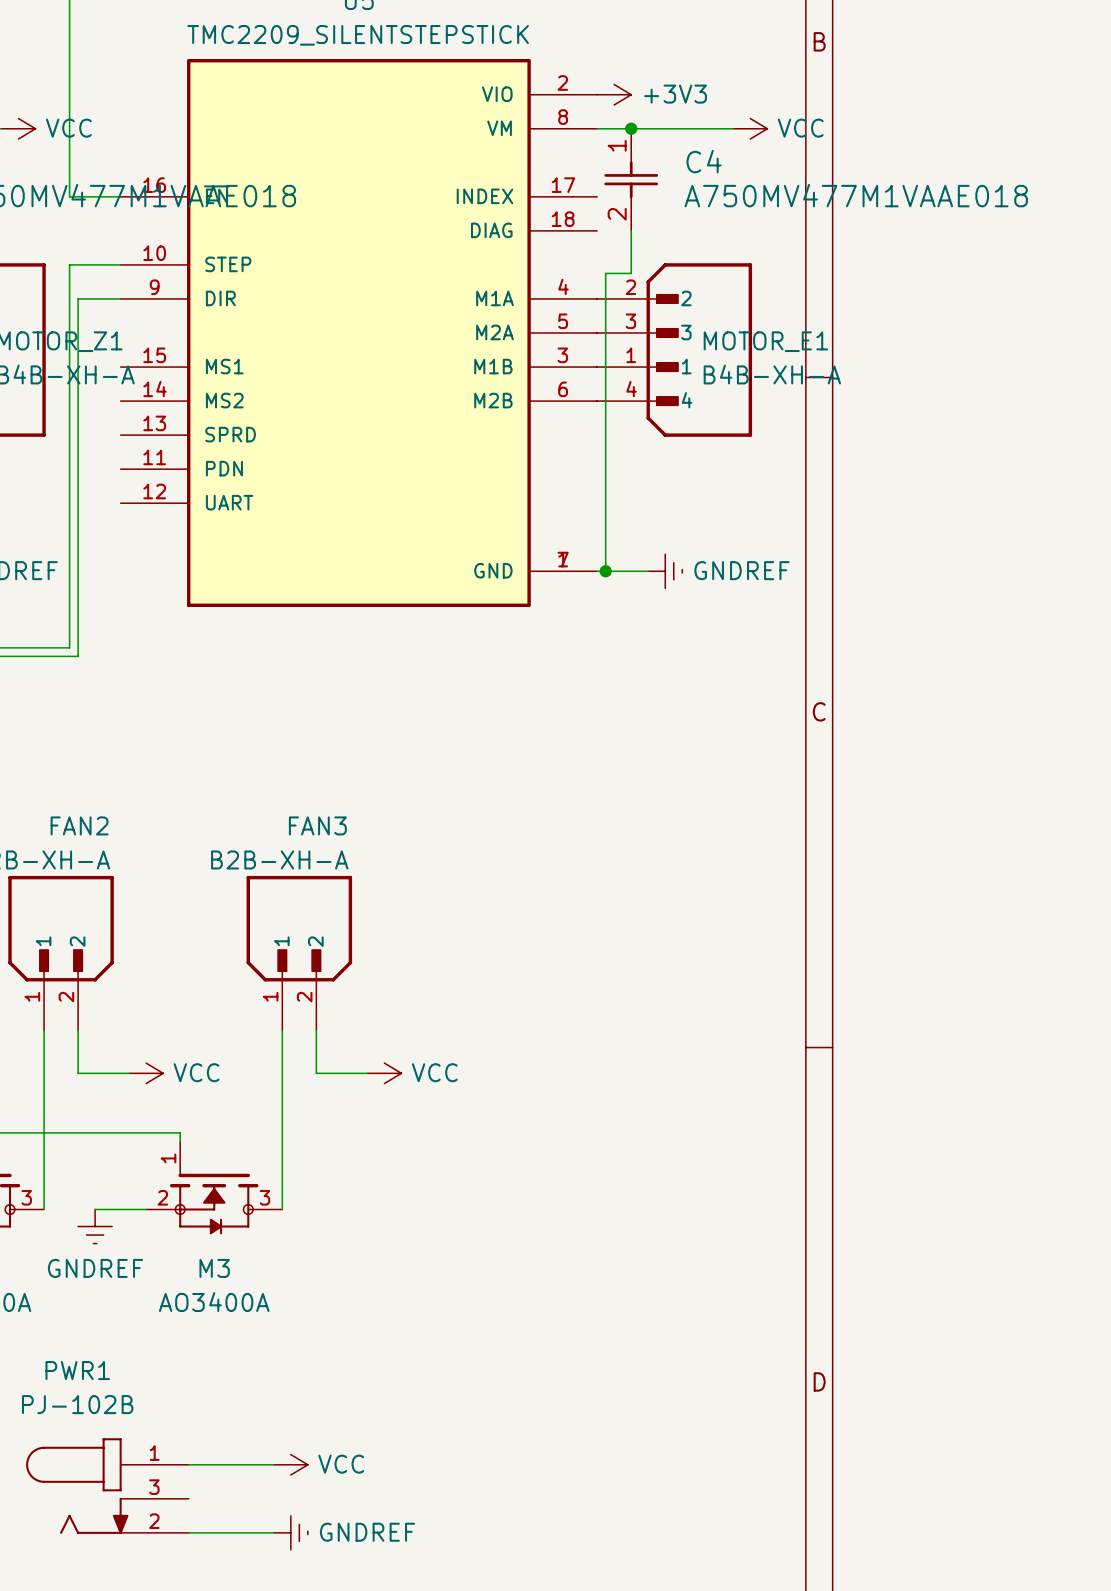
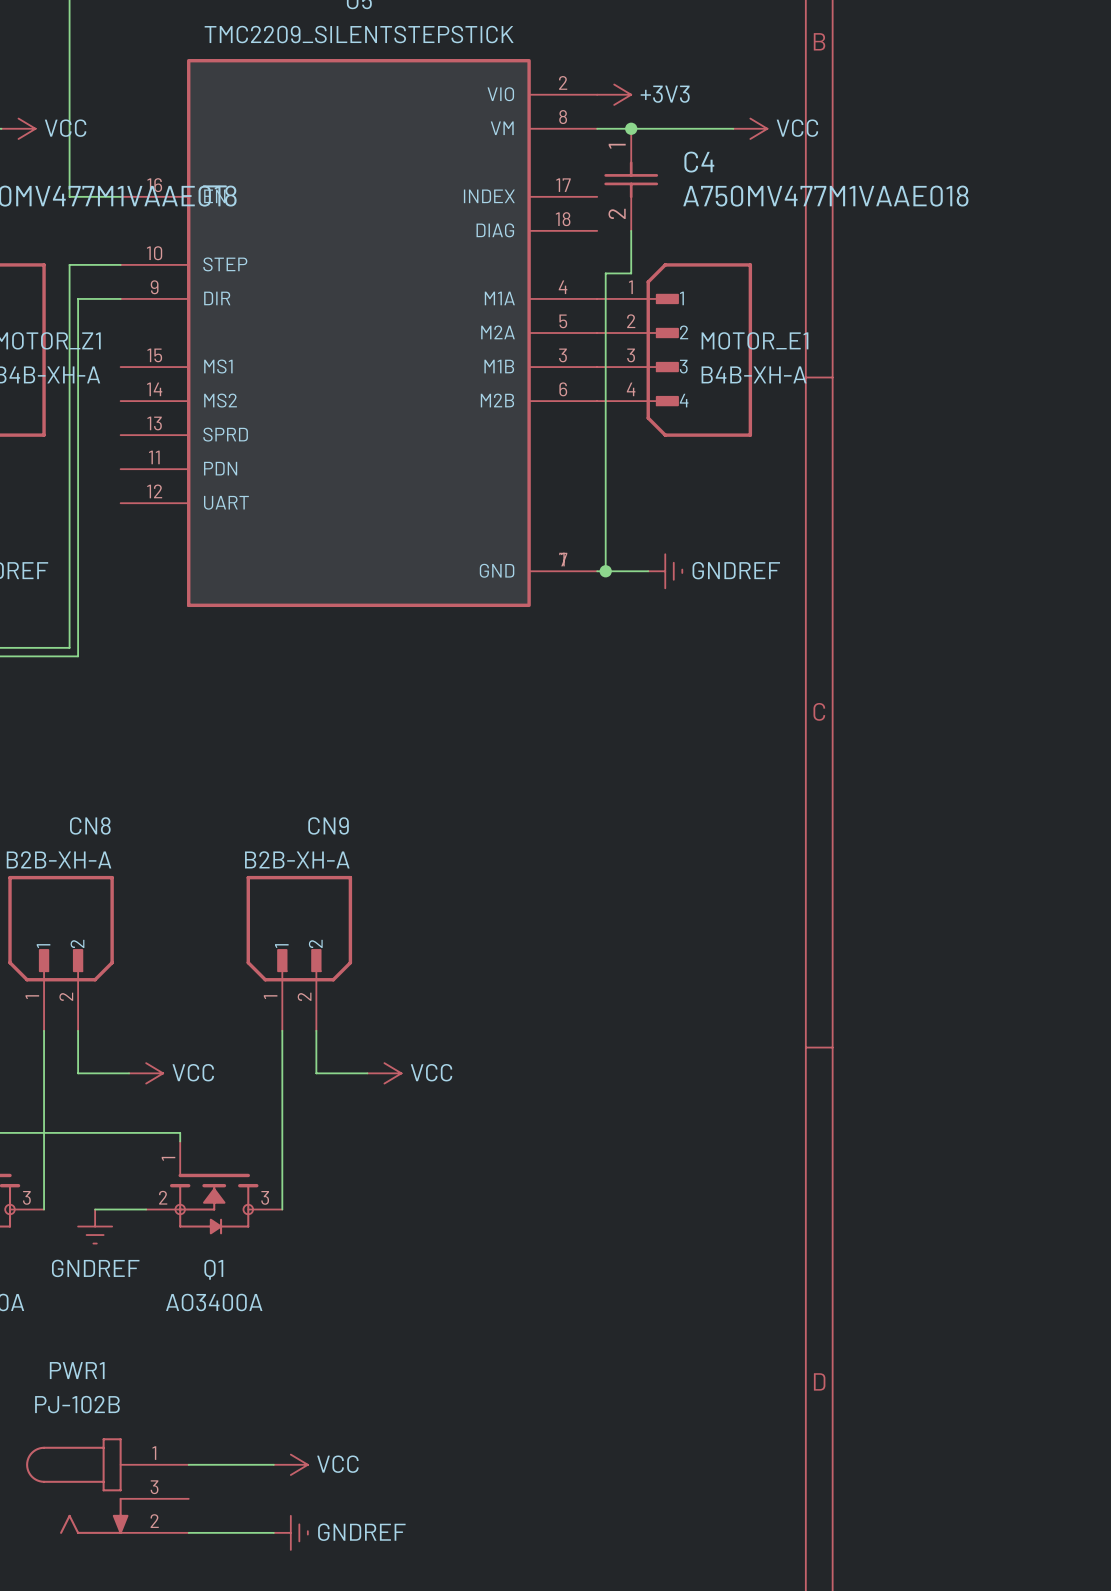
MOTOR_E1 pin number: 2 (630, 287) -> 1 (630, 287)
MOTOR_E1 pin name: 2 (686, 298) -> 1 (681, 298)
MOTOR_E1 pin number: 3 (630, 321) -> 2 (631, 321)
MOTOR_E1 pin name: 3 (686, 332) -> 2 (684, 332)
MOTOR_E1 pin number: 1 (631, 355) -> 3 (631, 355)
MOTOR_E1 pin name: 1 (686, 366) -> 3 (683, 366)
FAN2 name: FAN2 (79, 825) -> CN8 (90, 825)
FAN3 name: FAN3 (317, 825) -> CN9 (328, 825)
M3 name: M3 (214, 1268) -> Q1 (213, 1269)

